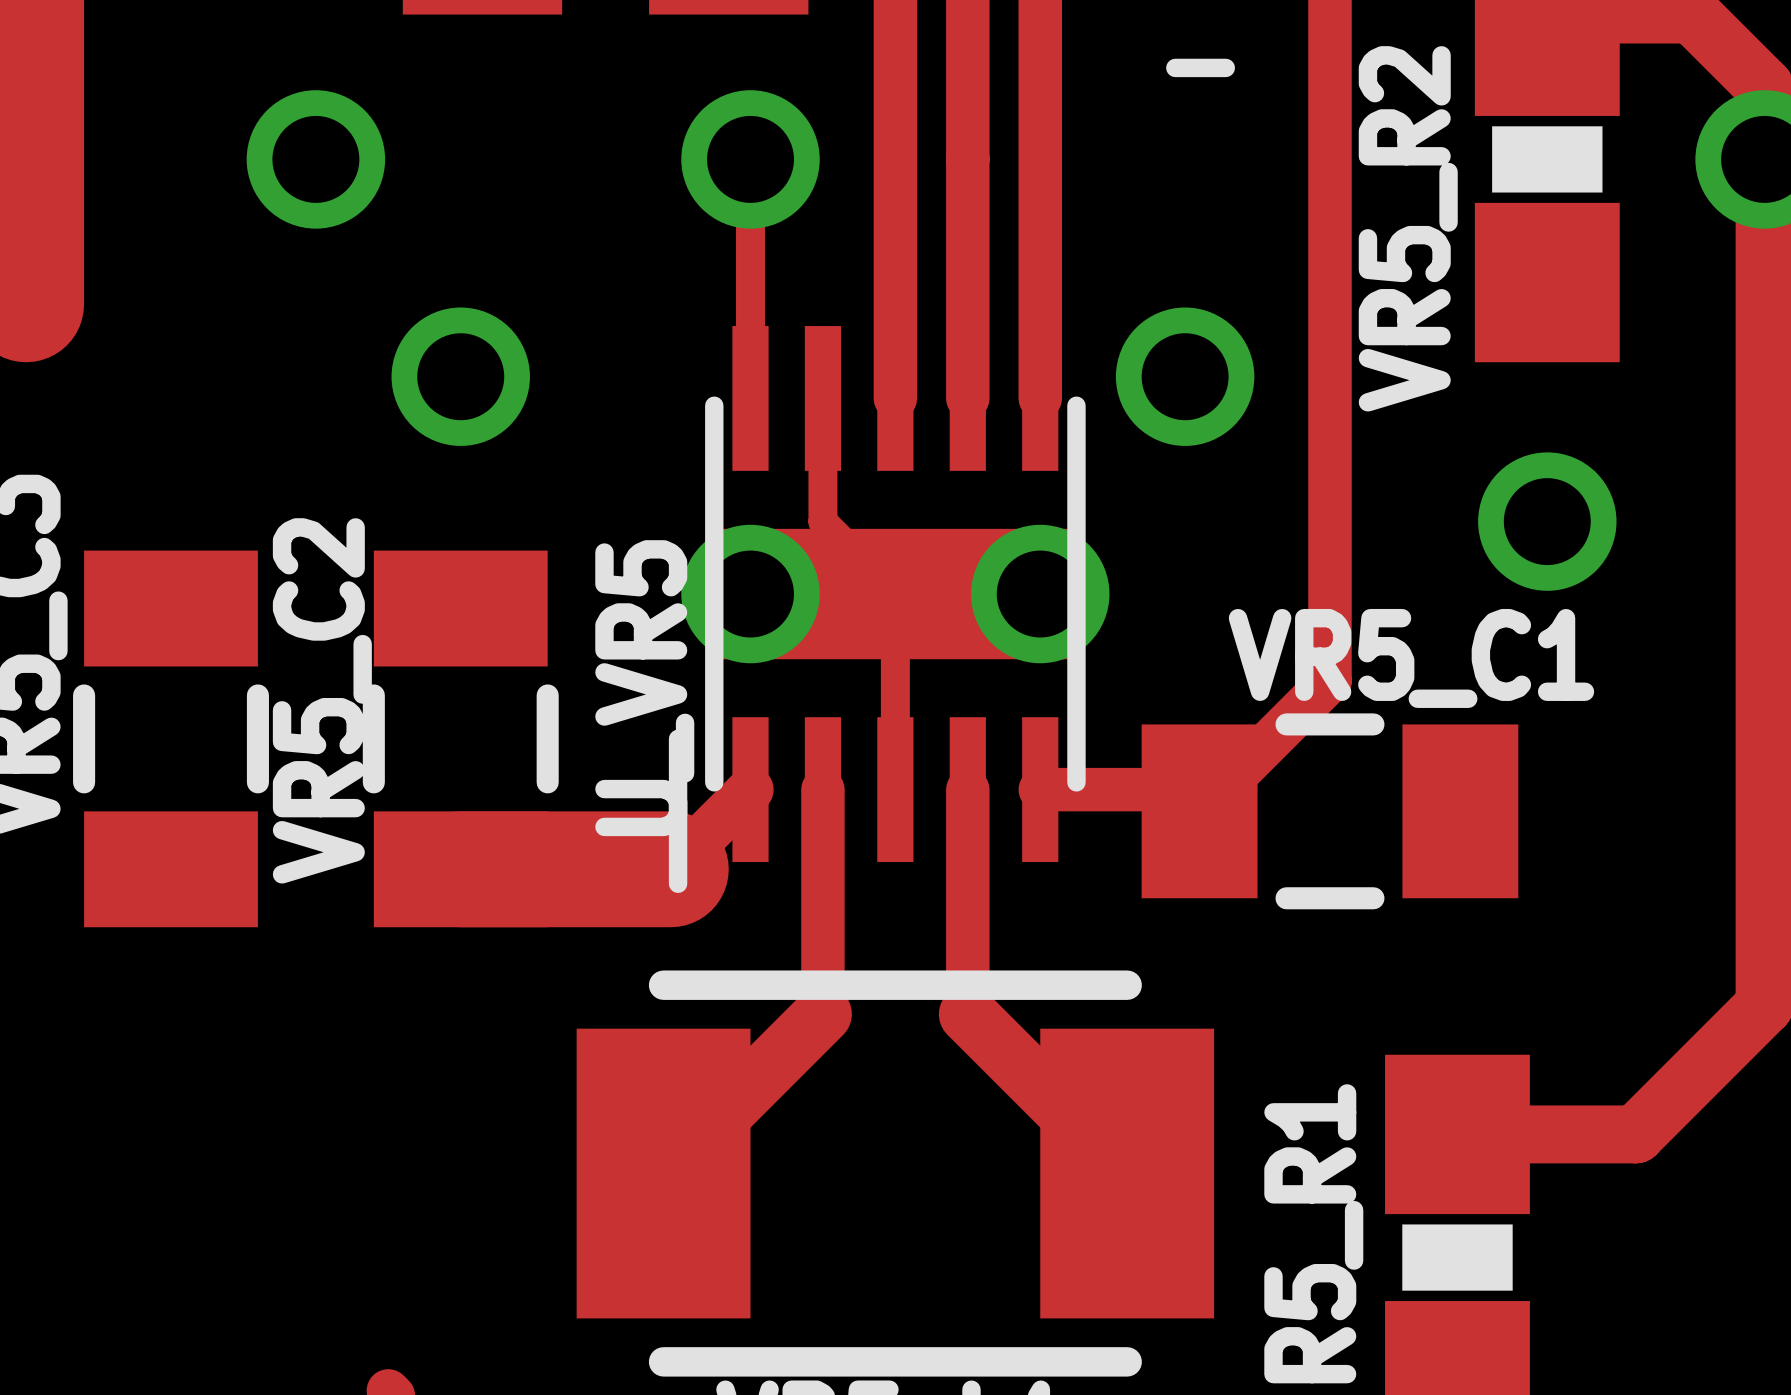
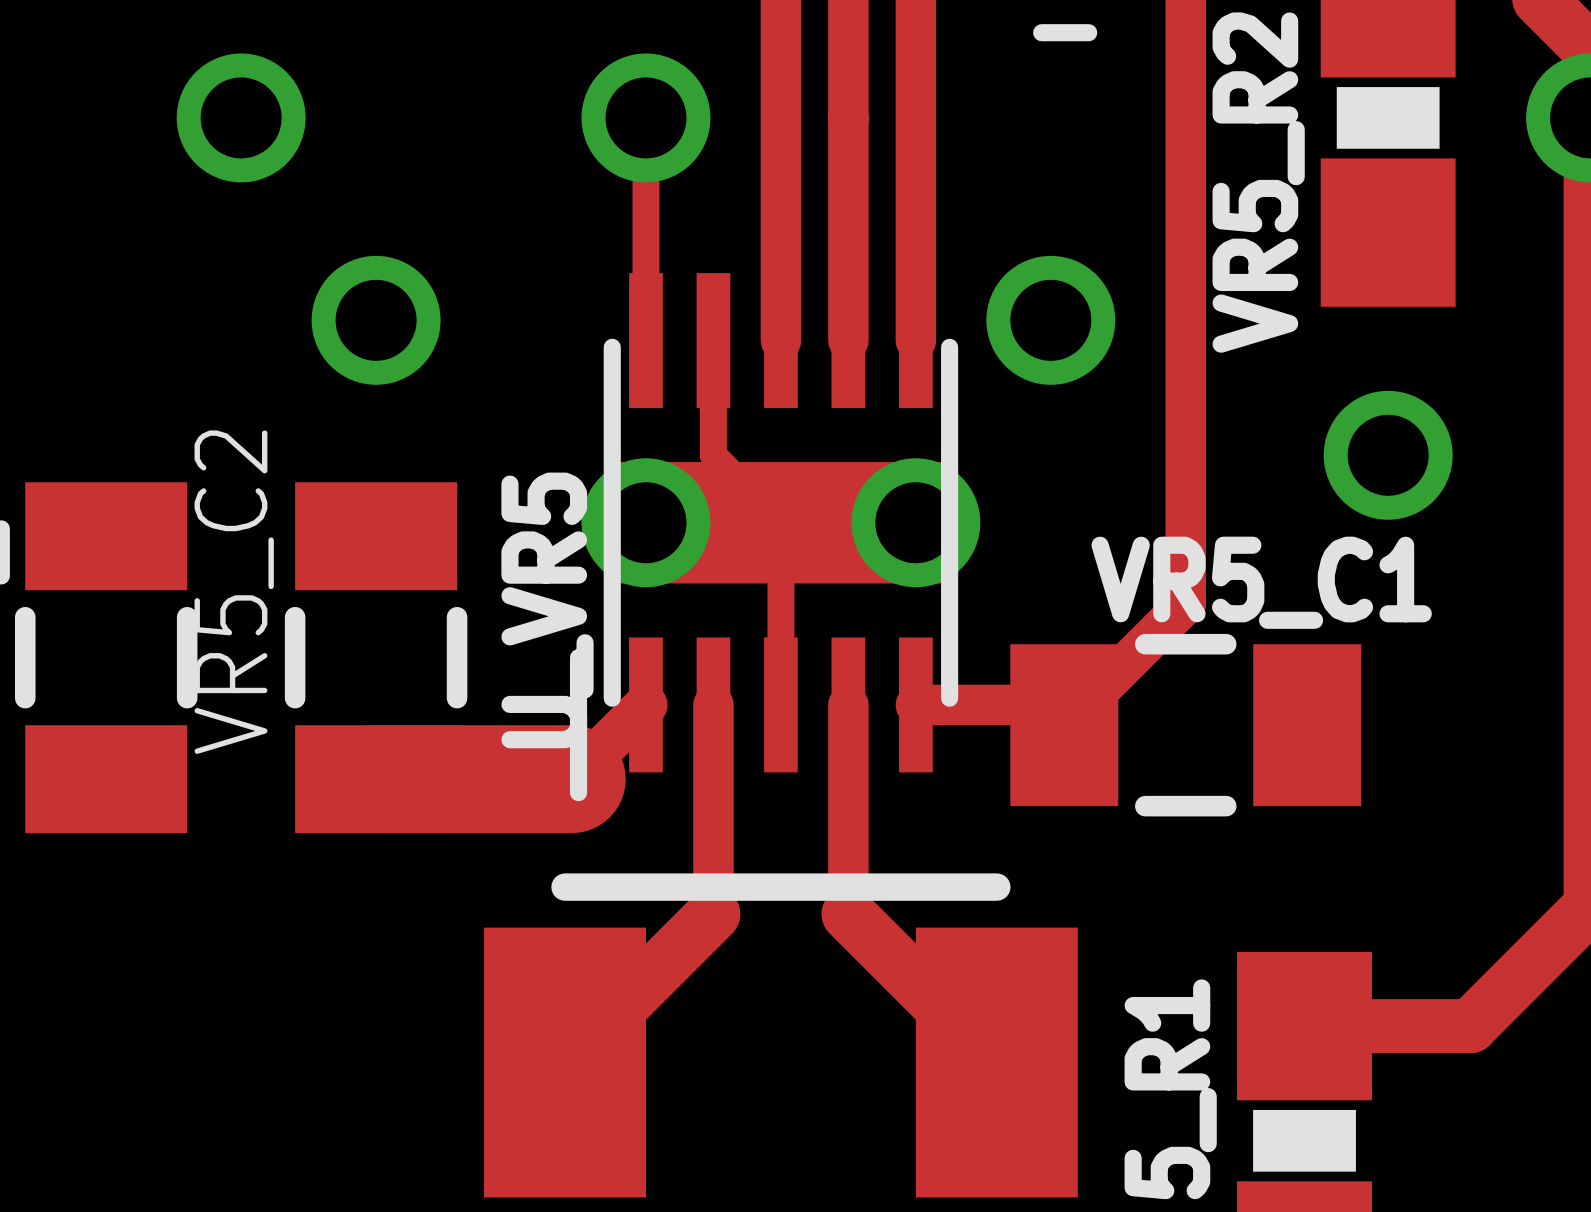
VR5_C2 name position: VR5_C2 (322, 700) -> VR5_C2 (234, 592)

